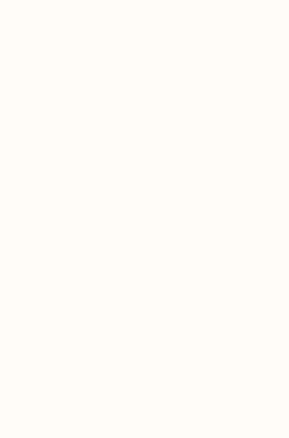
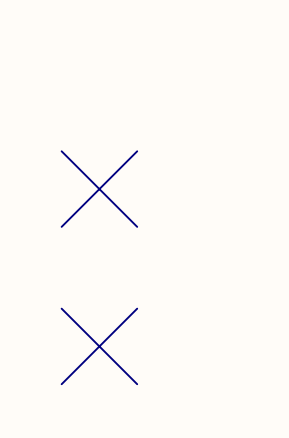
no-connect mark: none -> (99, 189)
no-connect mark: none -> (99, 346)

